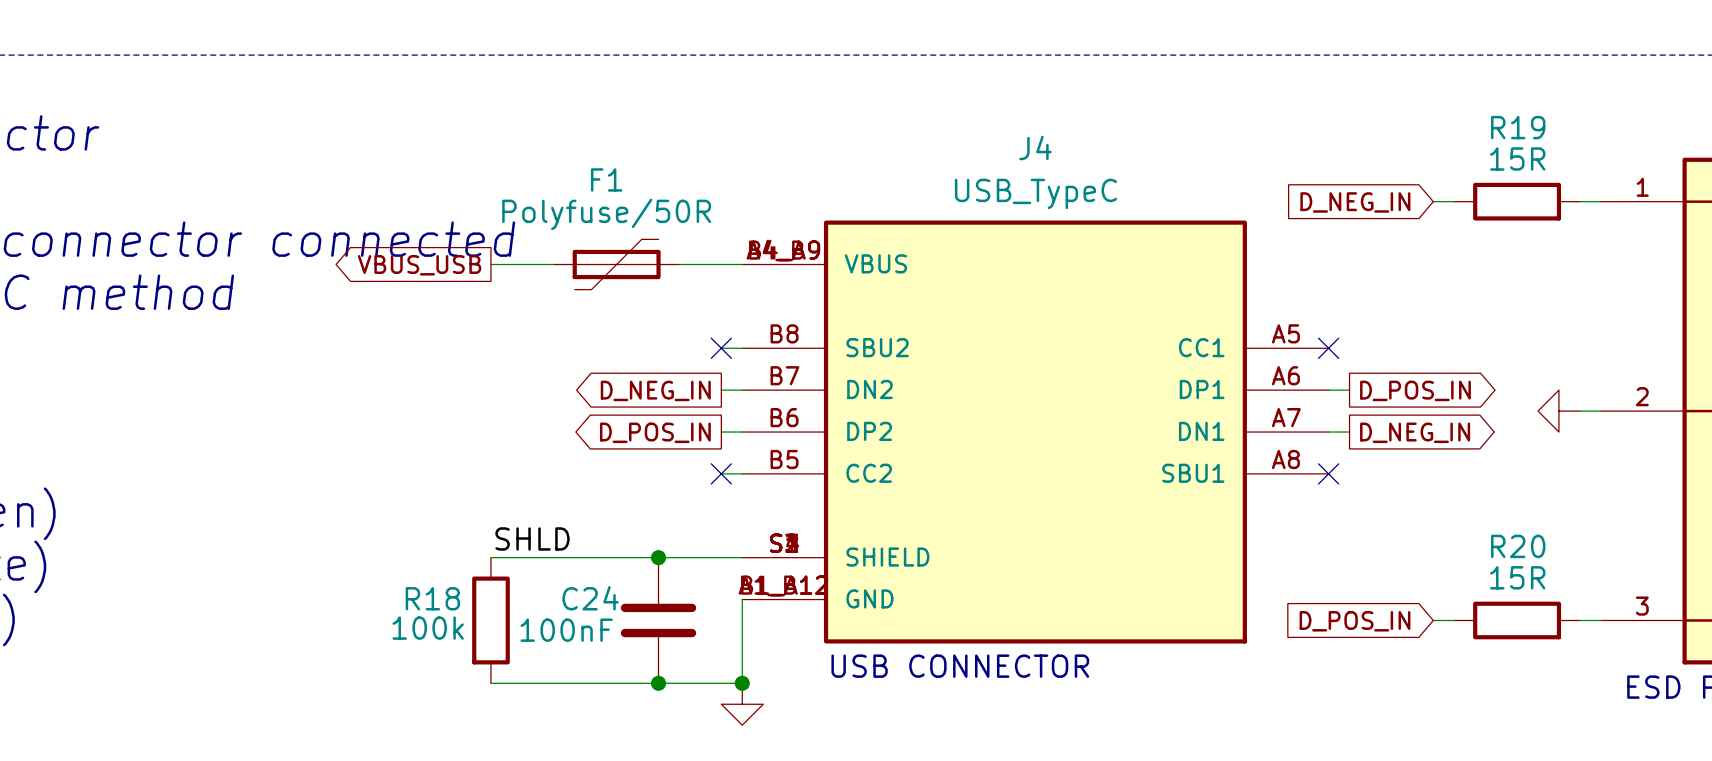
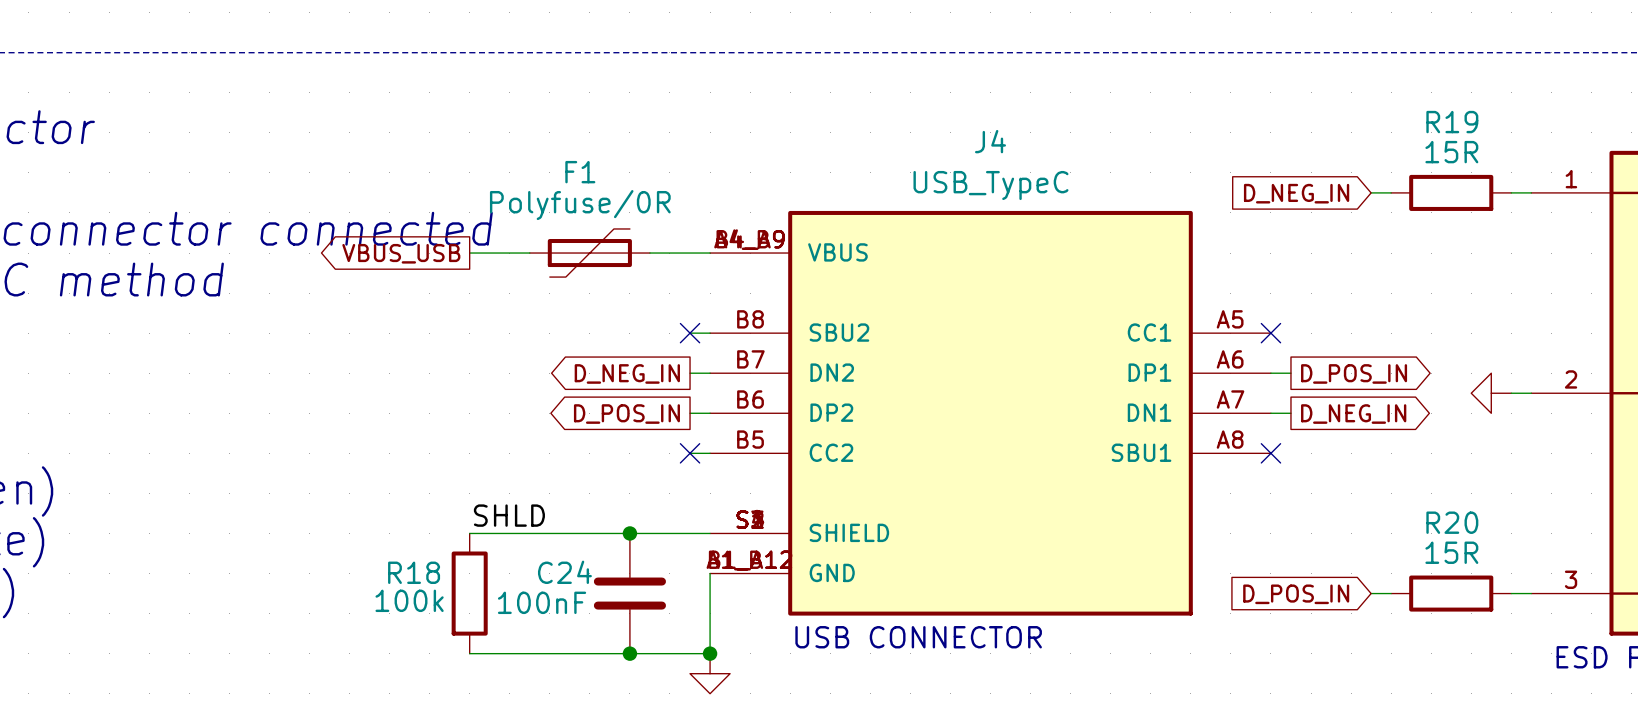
F1 value: Polyfuse/50R (606, 214) -> Polyfuse/0R (580, 205)

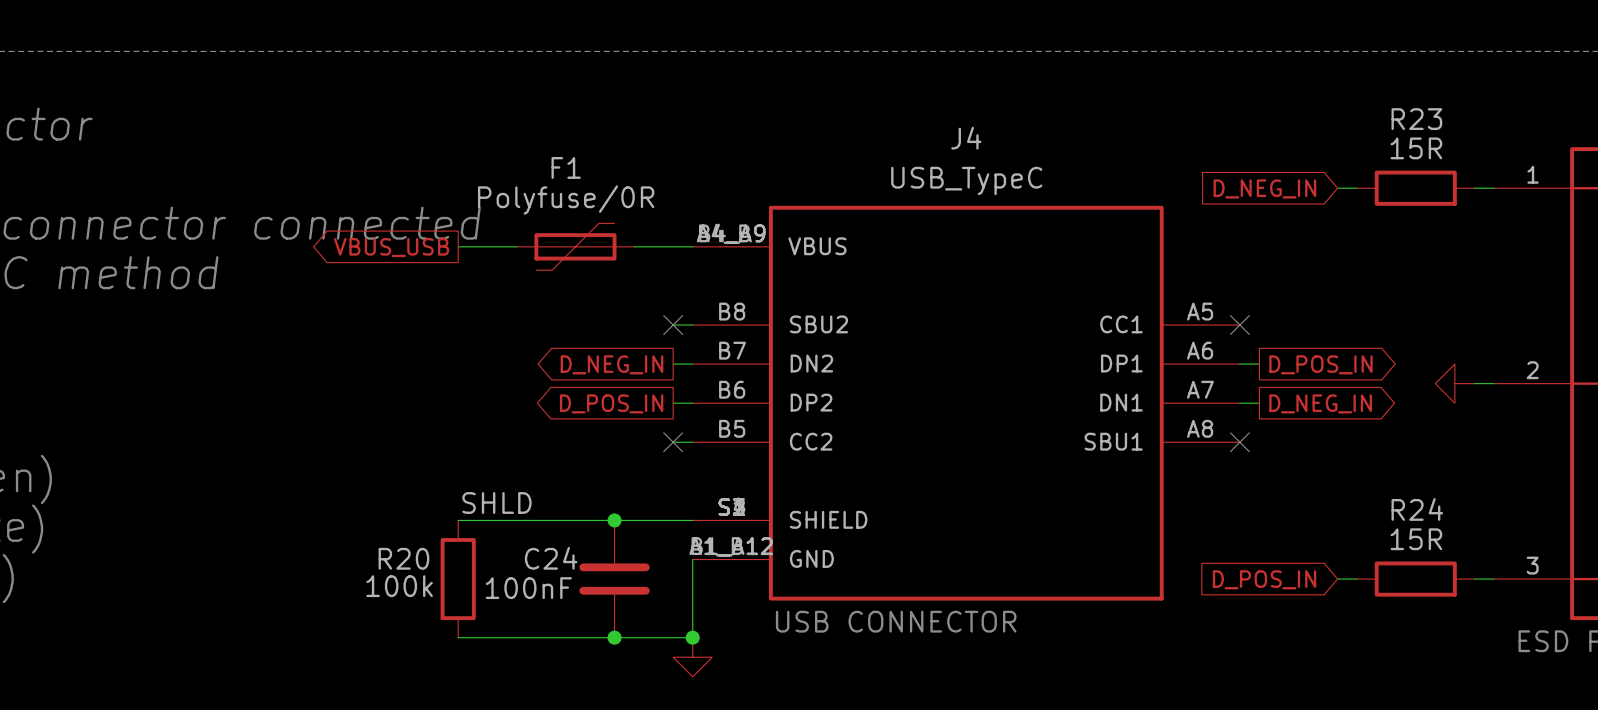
R19 name: R19 (1452, 122) -> R23 (1416, 119)
R20 name: R20 (1452, 522) -> R24 (1417, 509)
R18 name: R18 (414, 572) -> R20 (403, 558)

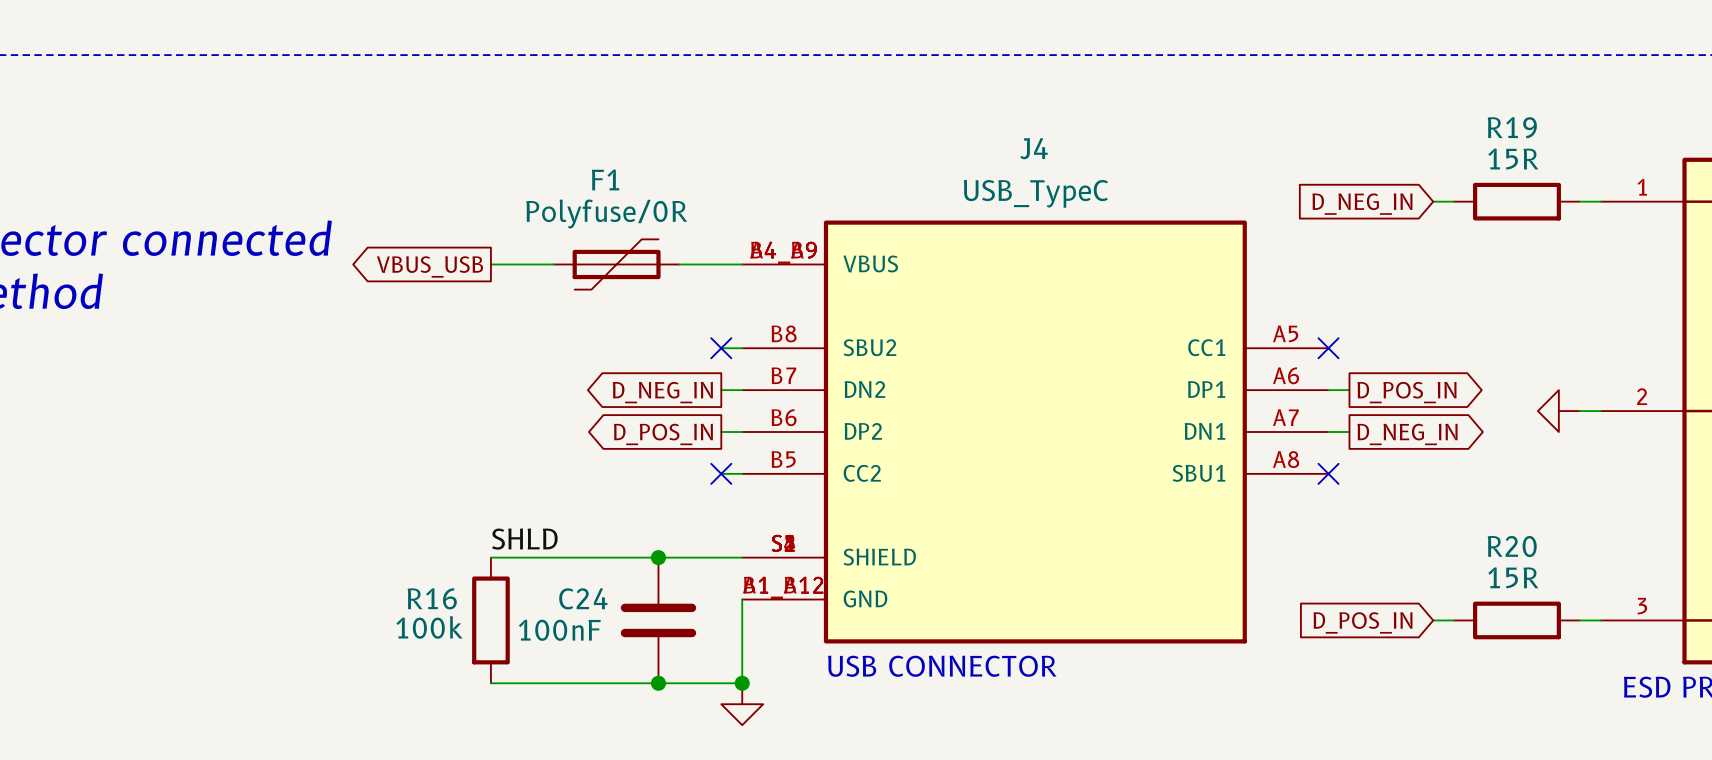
R23 name: R23 (1416, 119) -> R19 (1512, 127)
R24 name: R24 (1417, 509) -> R20 (1512, 546)
R20 name: R20 (403, 558) -> R16 (432, 598)

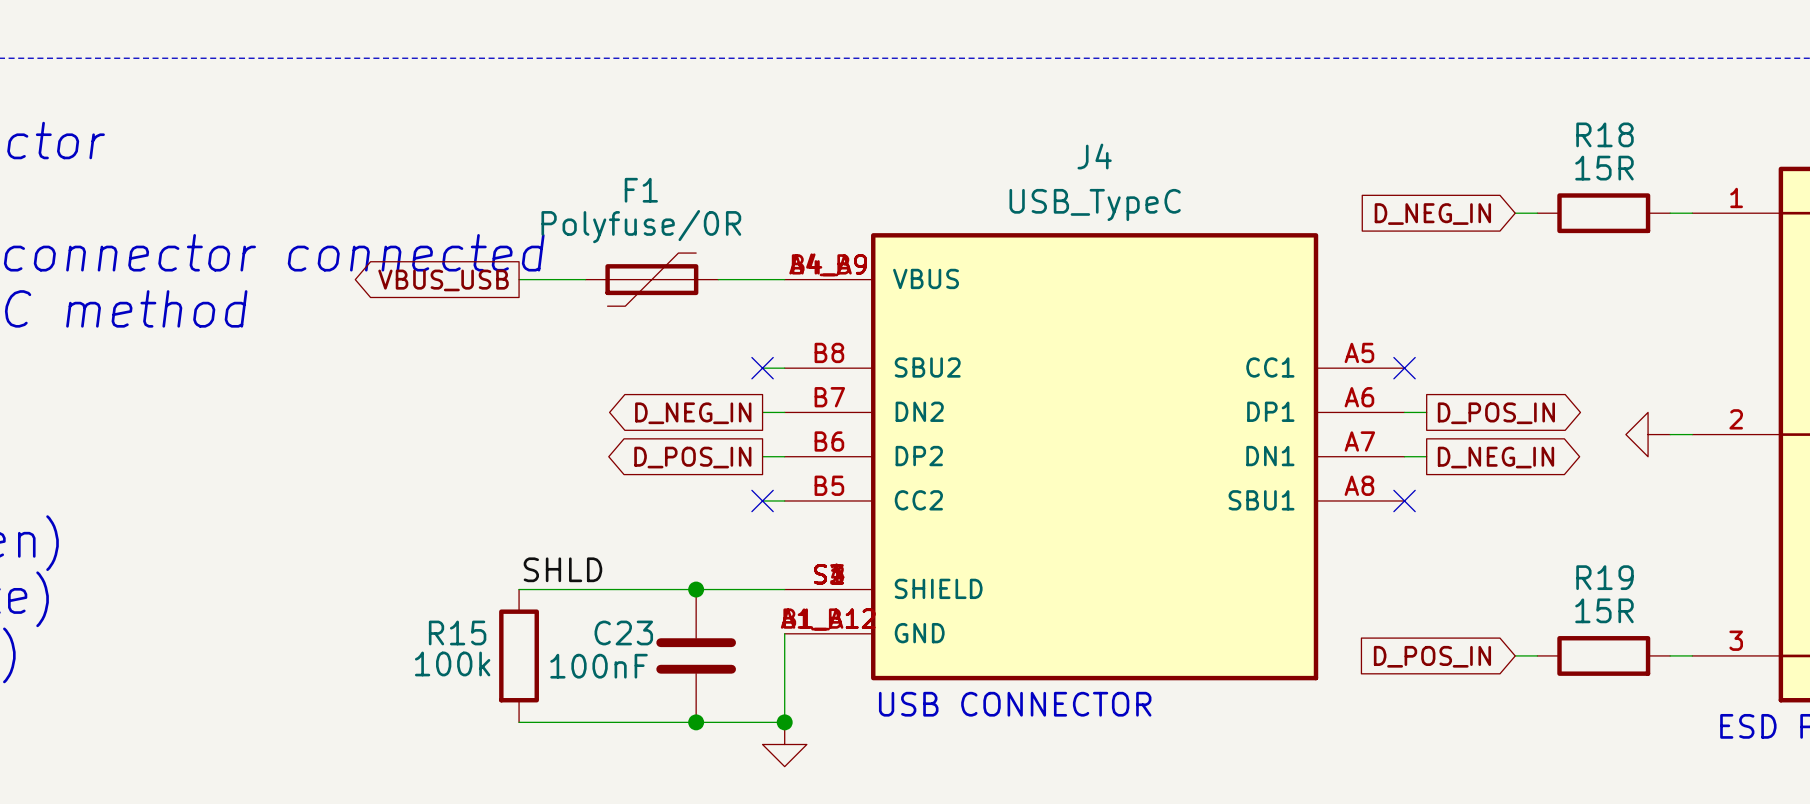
R19 name: R19 (1512, 127) -> R18 (1605, 134)
R20 name: R20 (1512, 546) -> R19 (1605, 577)
R16 name: R16 (432, 598) -> R15 (457, 632)
C24 name: C24 (583, 598) -> C23 (623, 632)

